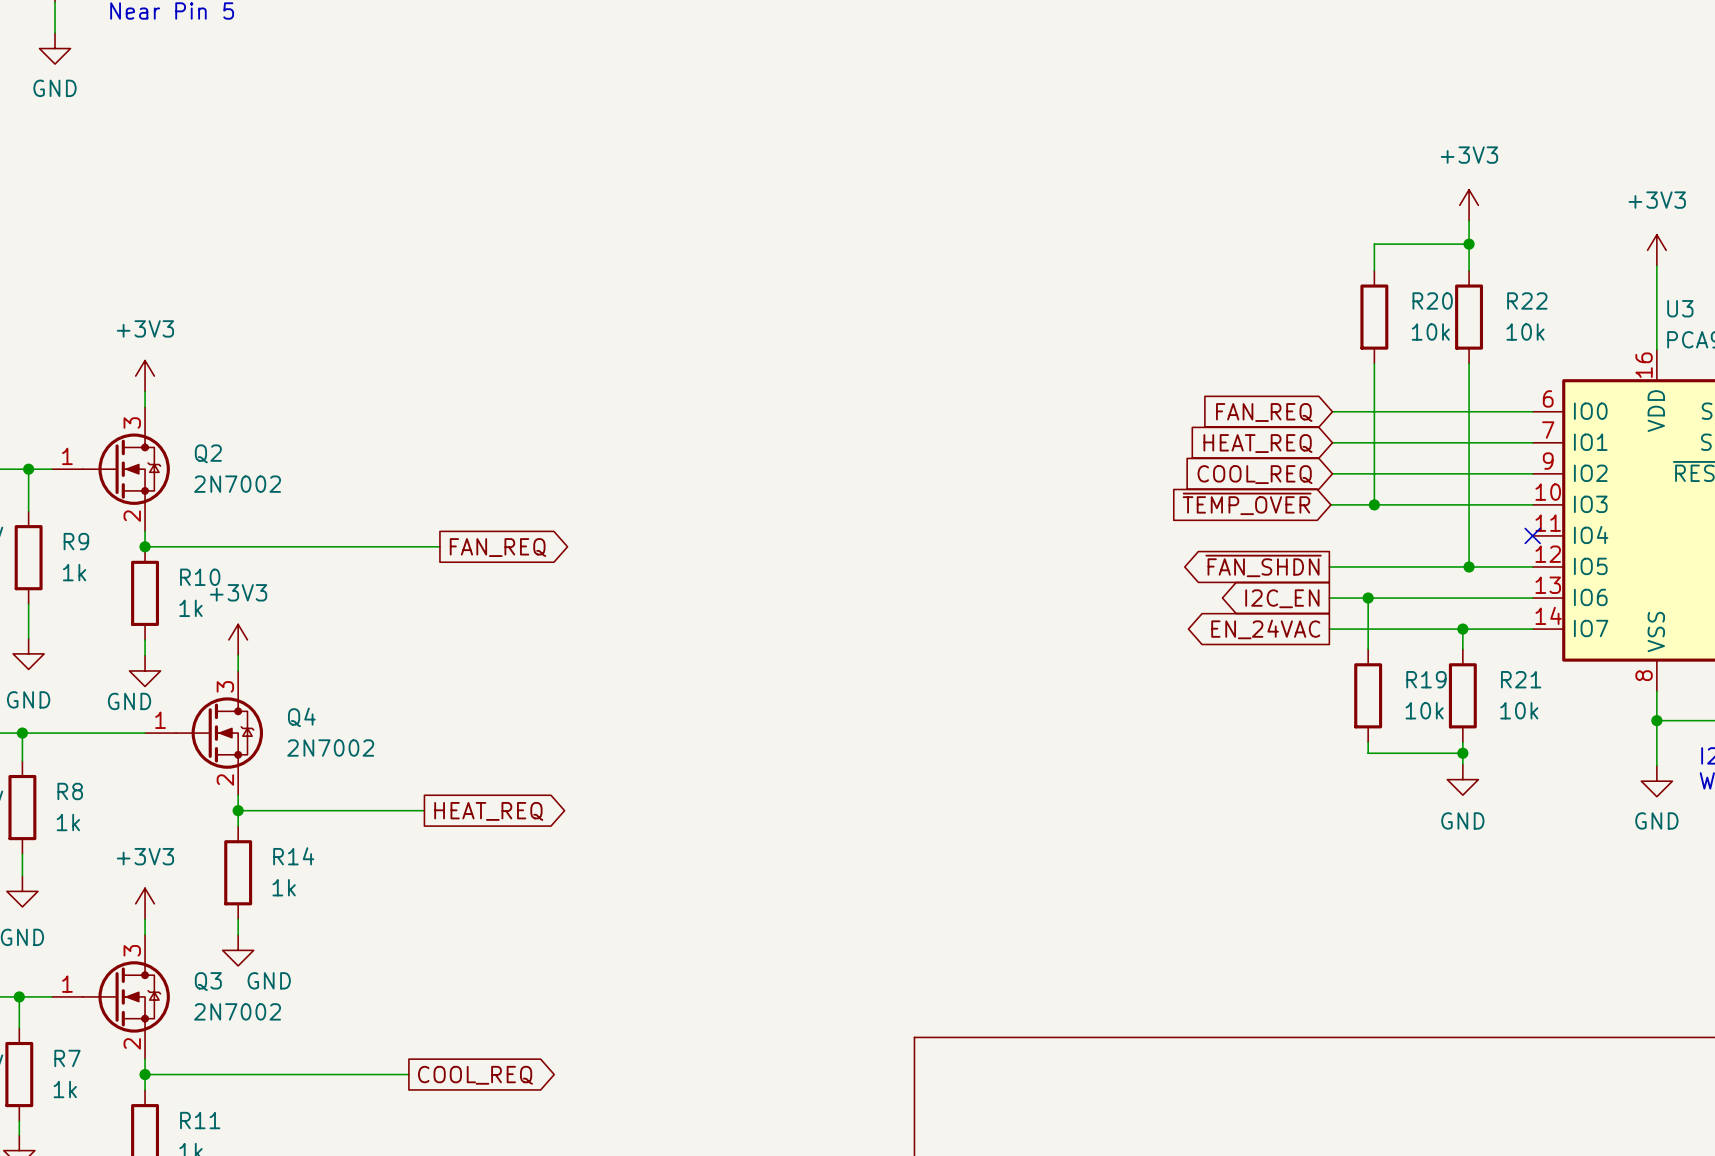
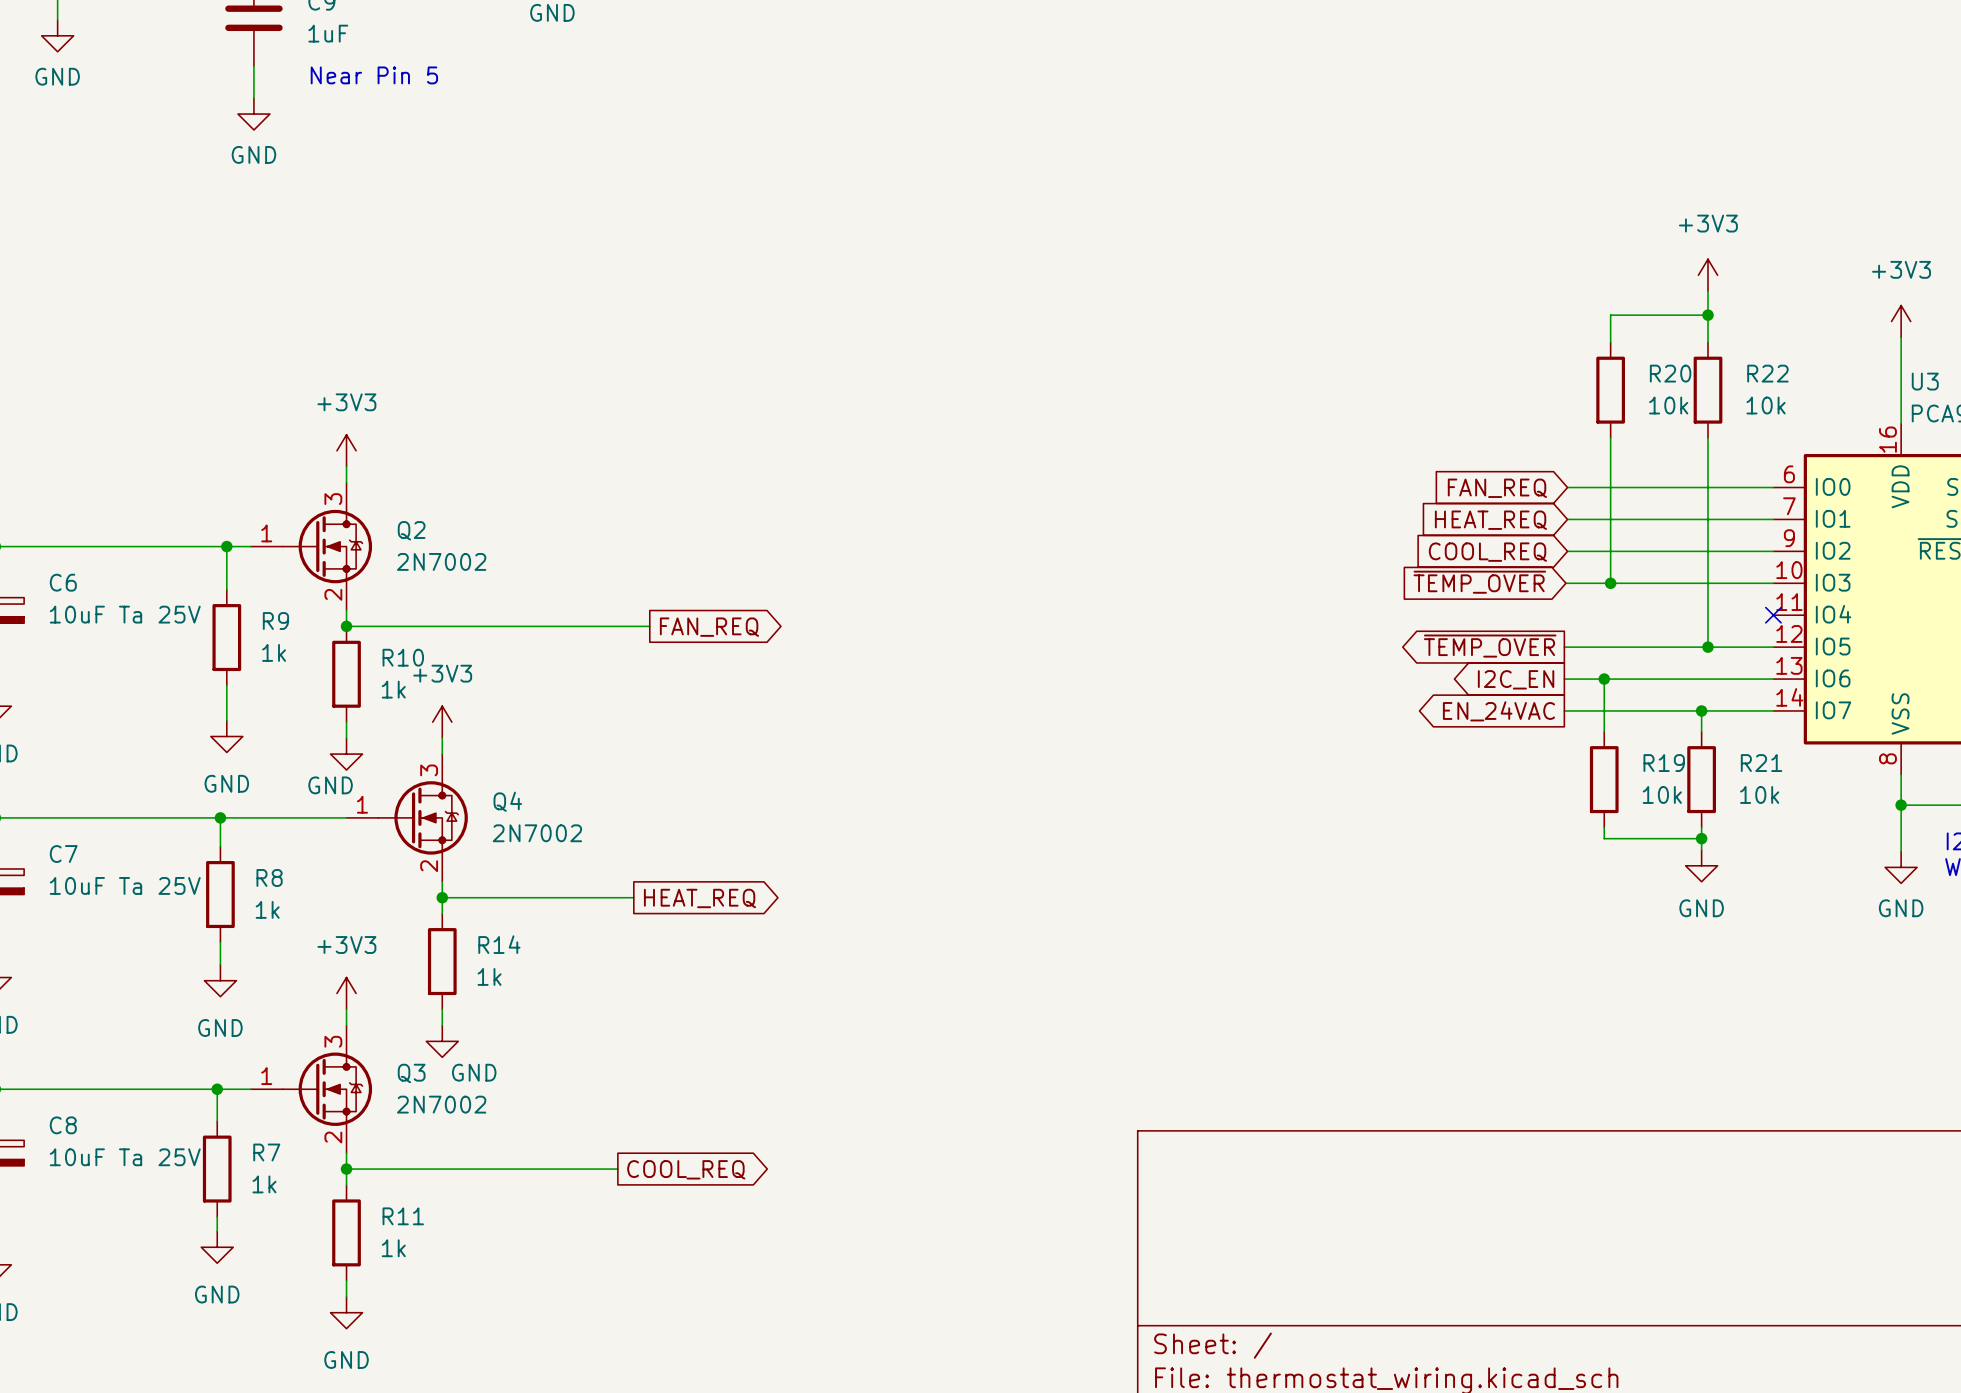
global label: ~{FAN_SHDN} (1263, 565) -> ~{TEMP_OVER} (1490, 646)

